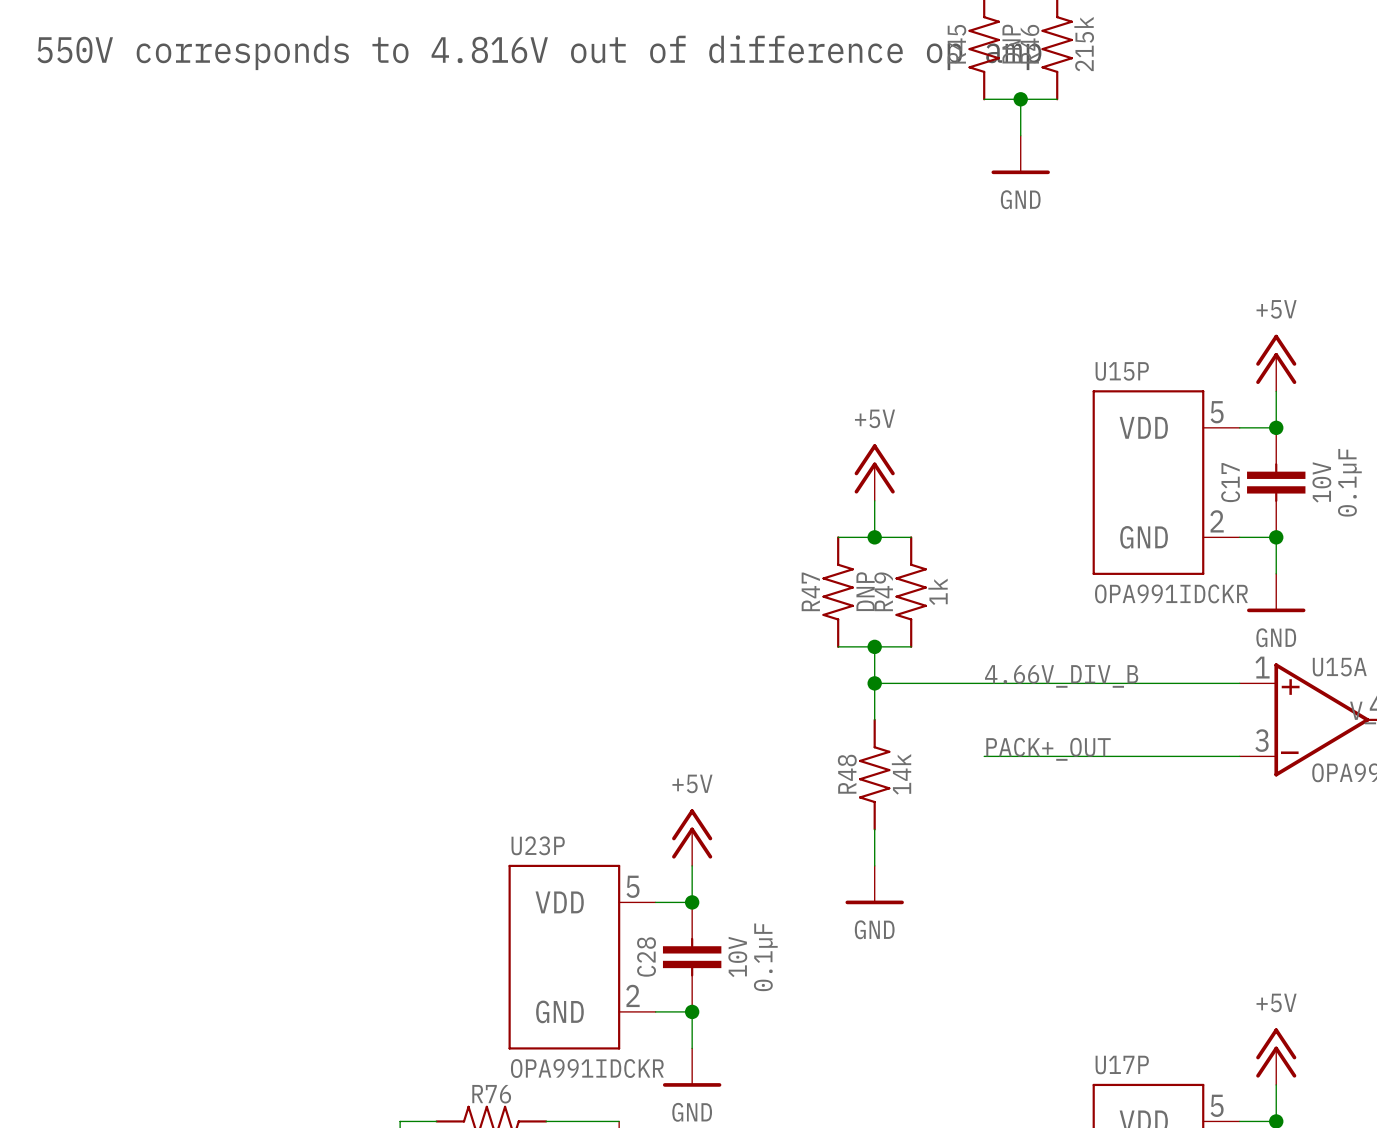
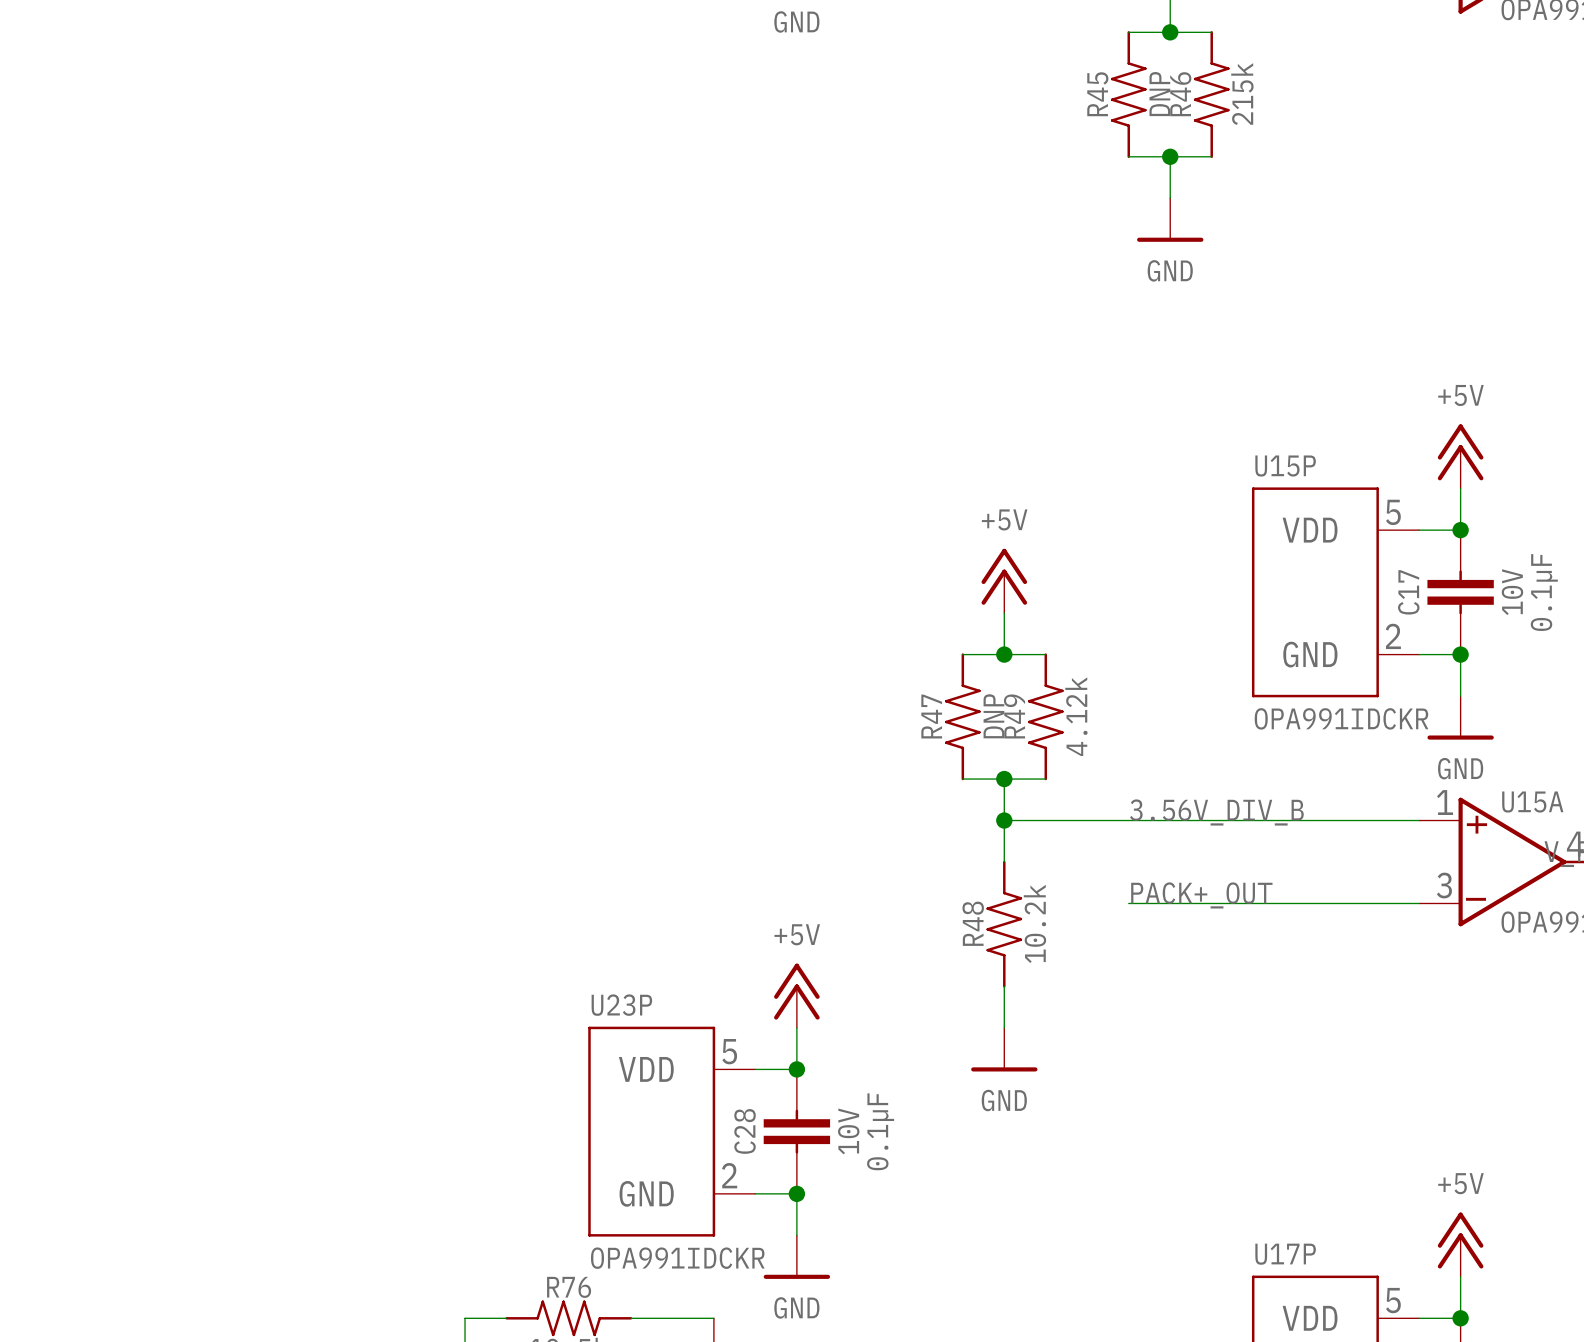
text: 550V corresponds to 4.816V out of difference op amp (539, 52) -> none
R49 text: 1k (938, 591) -> 4.12k (1076, 716)
label: 4.66V_DIV_B (1061, 676) -> 3.56V_DIV_B (1216, 812)
R48 text: 14k (901, 774) -> 10.2k (1034, 923)

